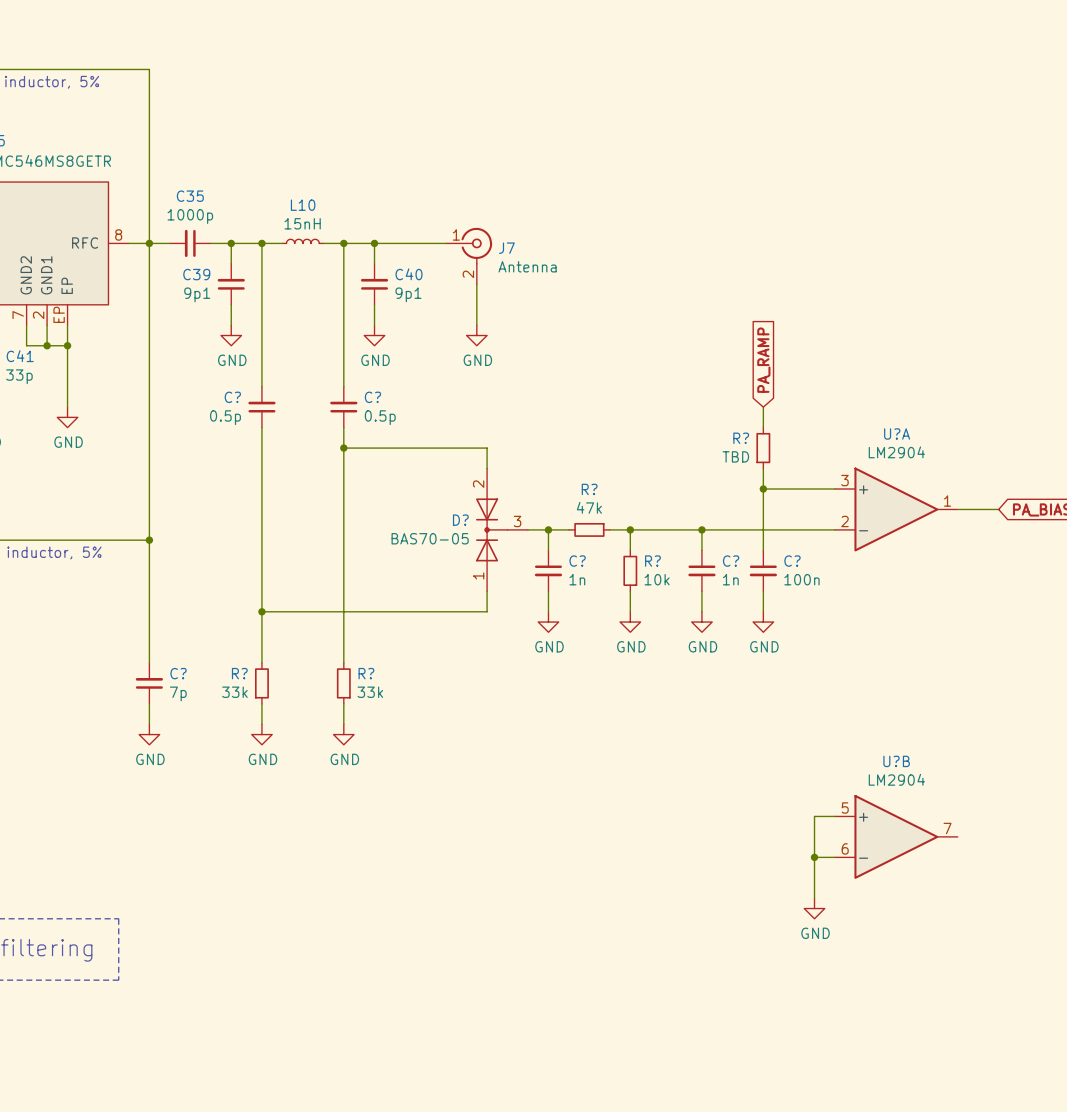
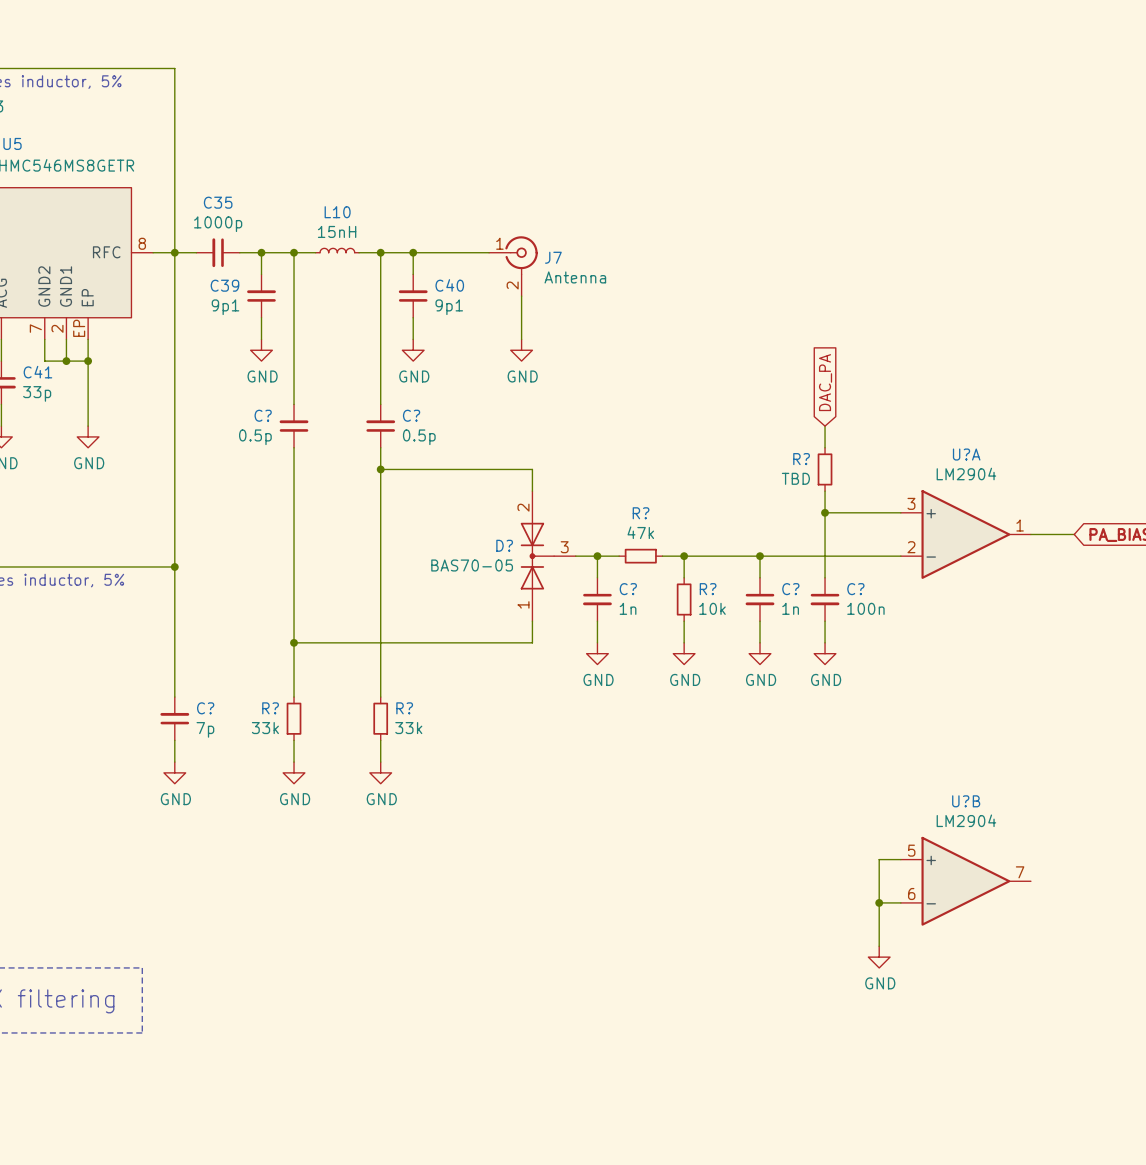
global label: PA_RAMP (763, 360) -> DAC_PA (825, 382)

